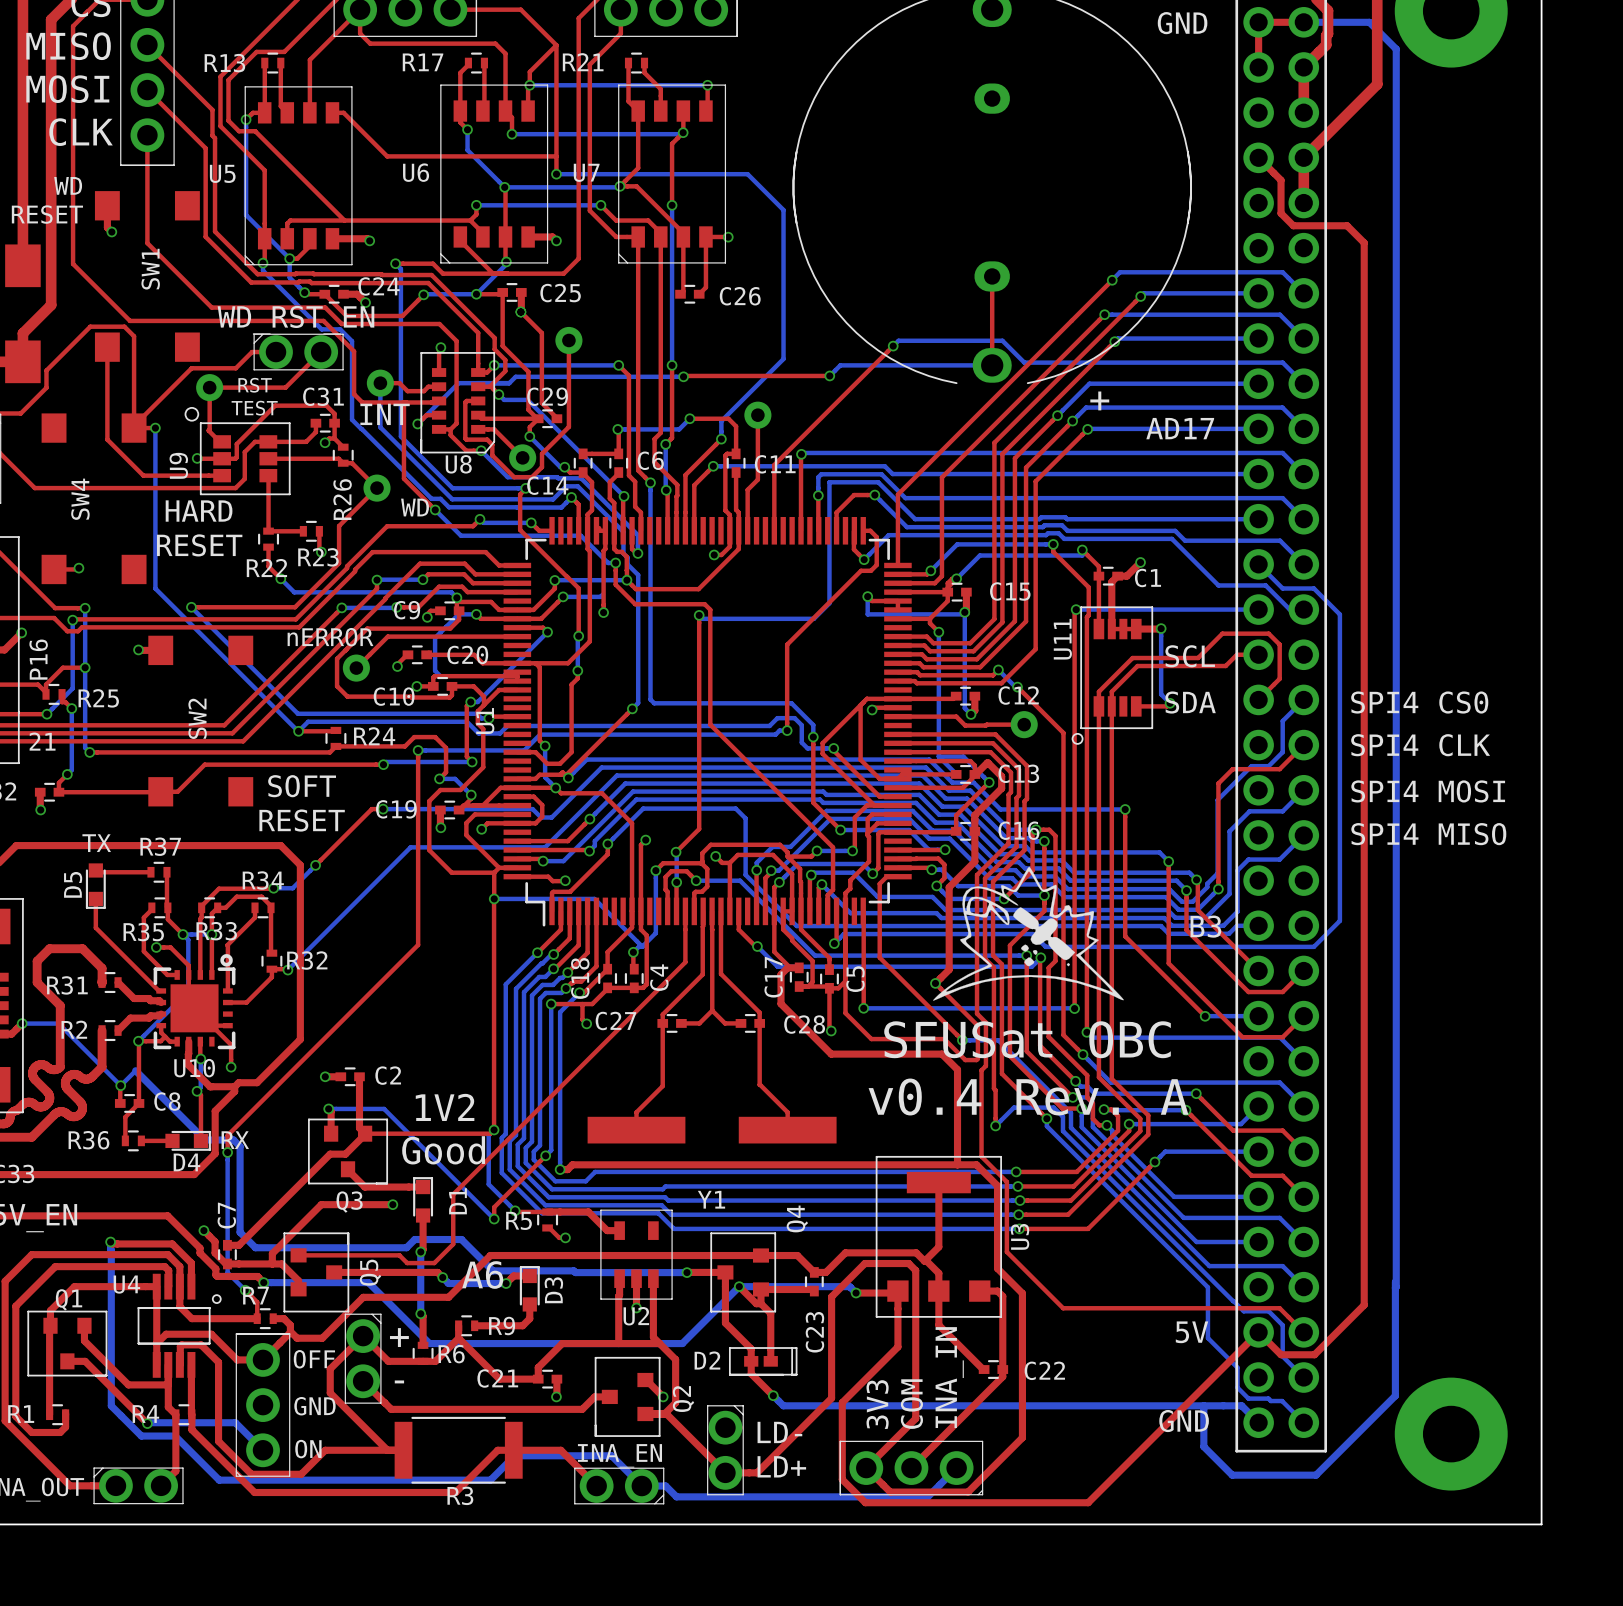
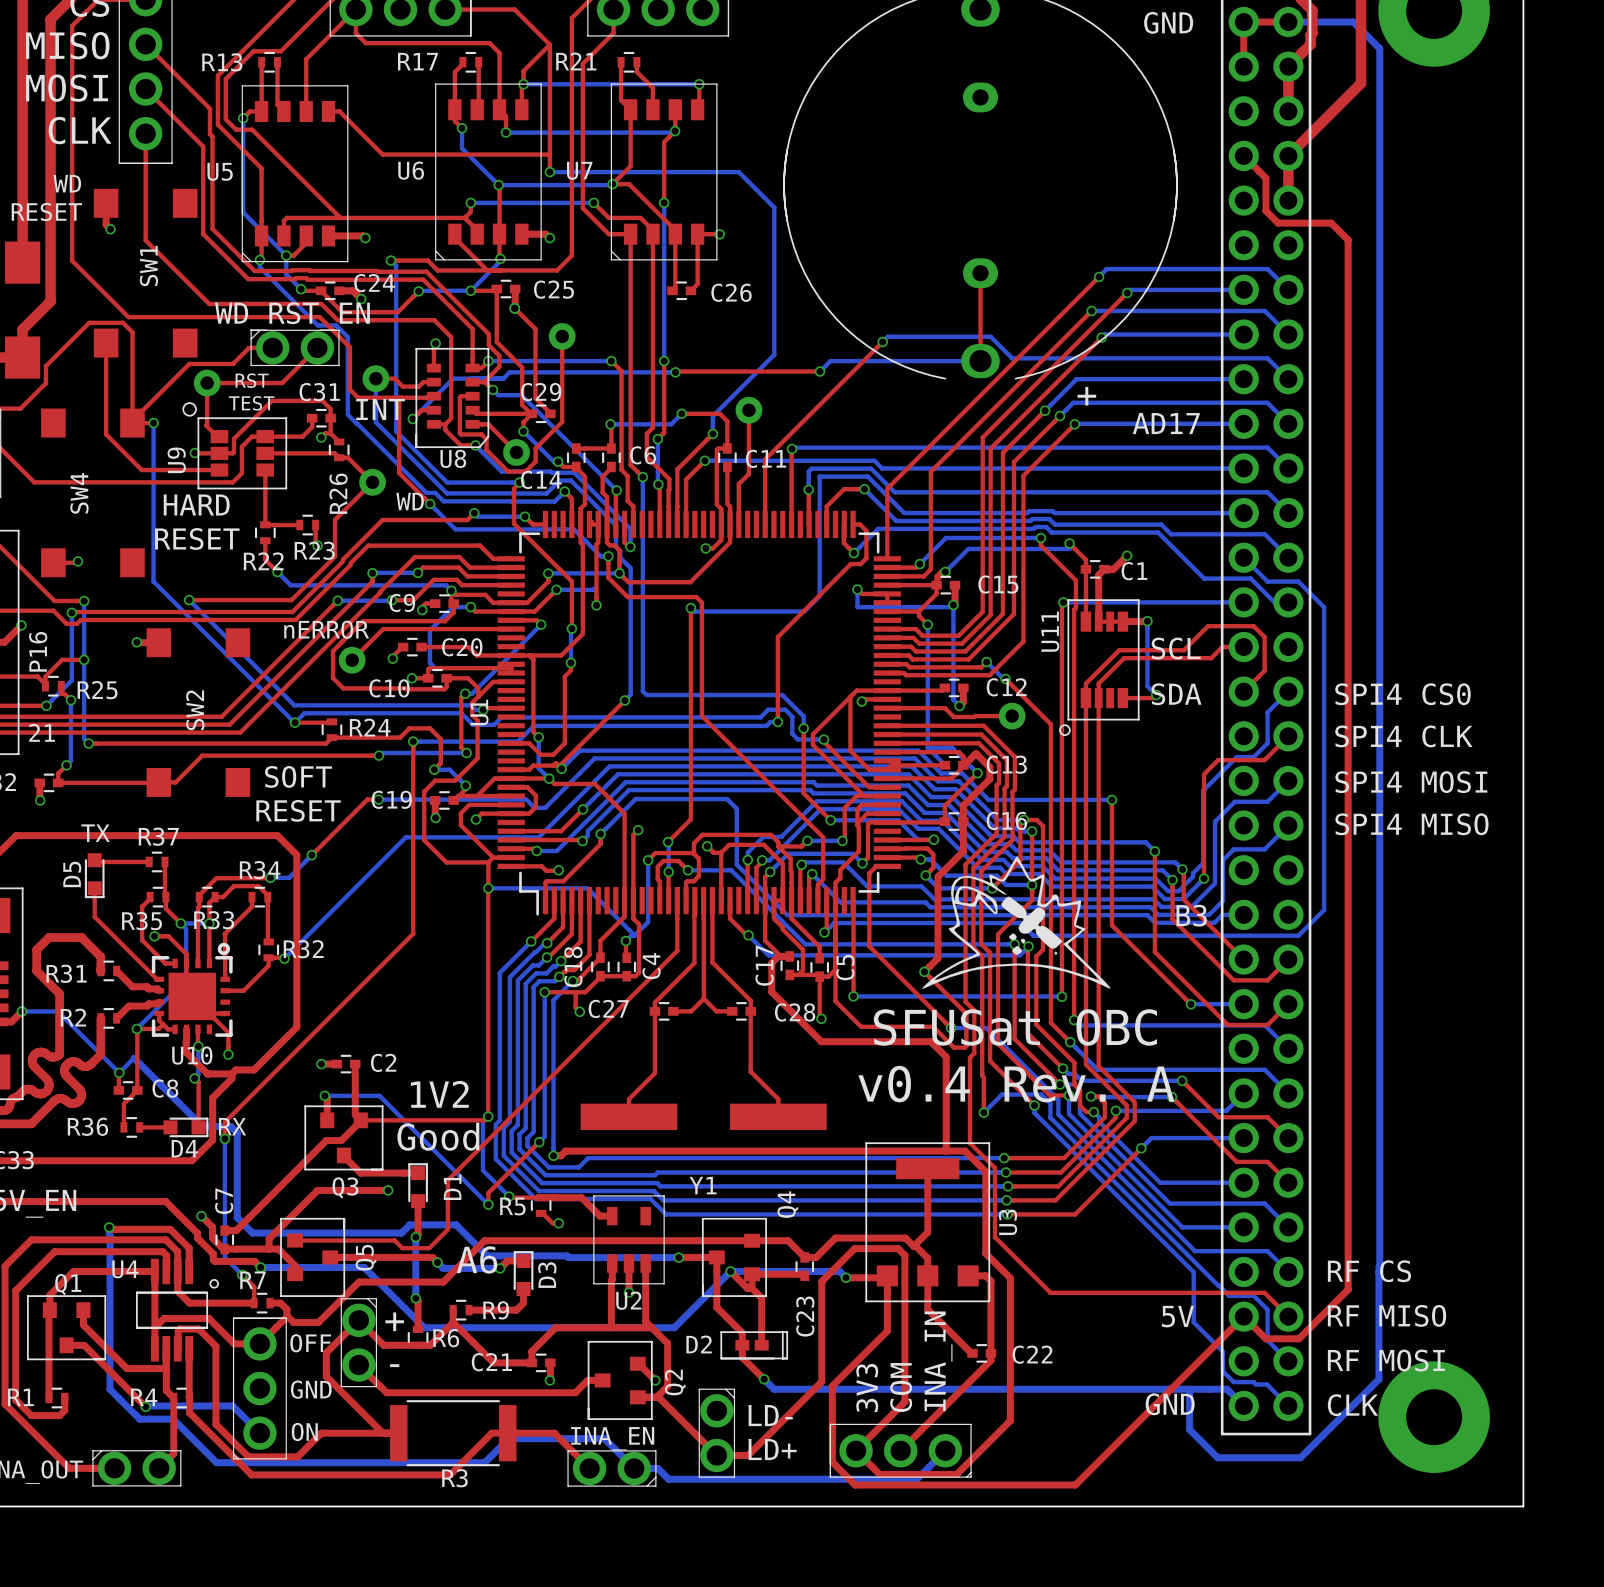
text: none -> RF CS (1369, 1271)
text: none -> RF MISO (1387, 1315)
text: none -> RF MOSI (1386, 1360)
text: none -> CLK (1352, 1405)

